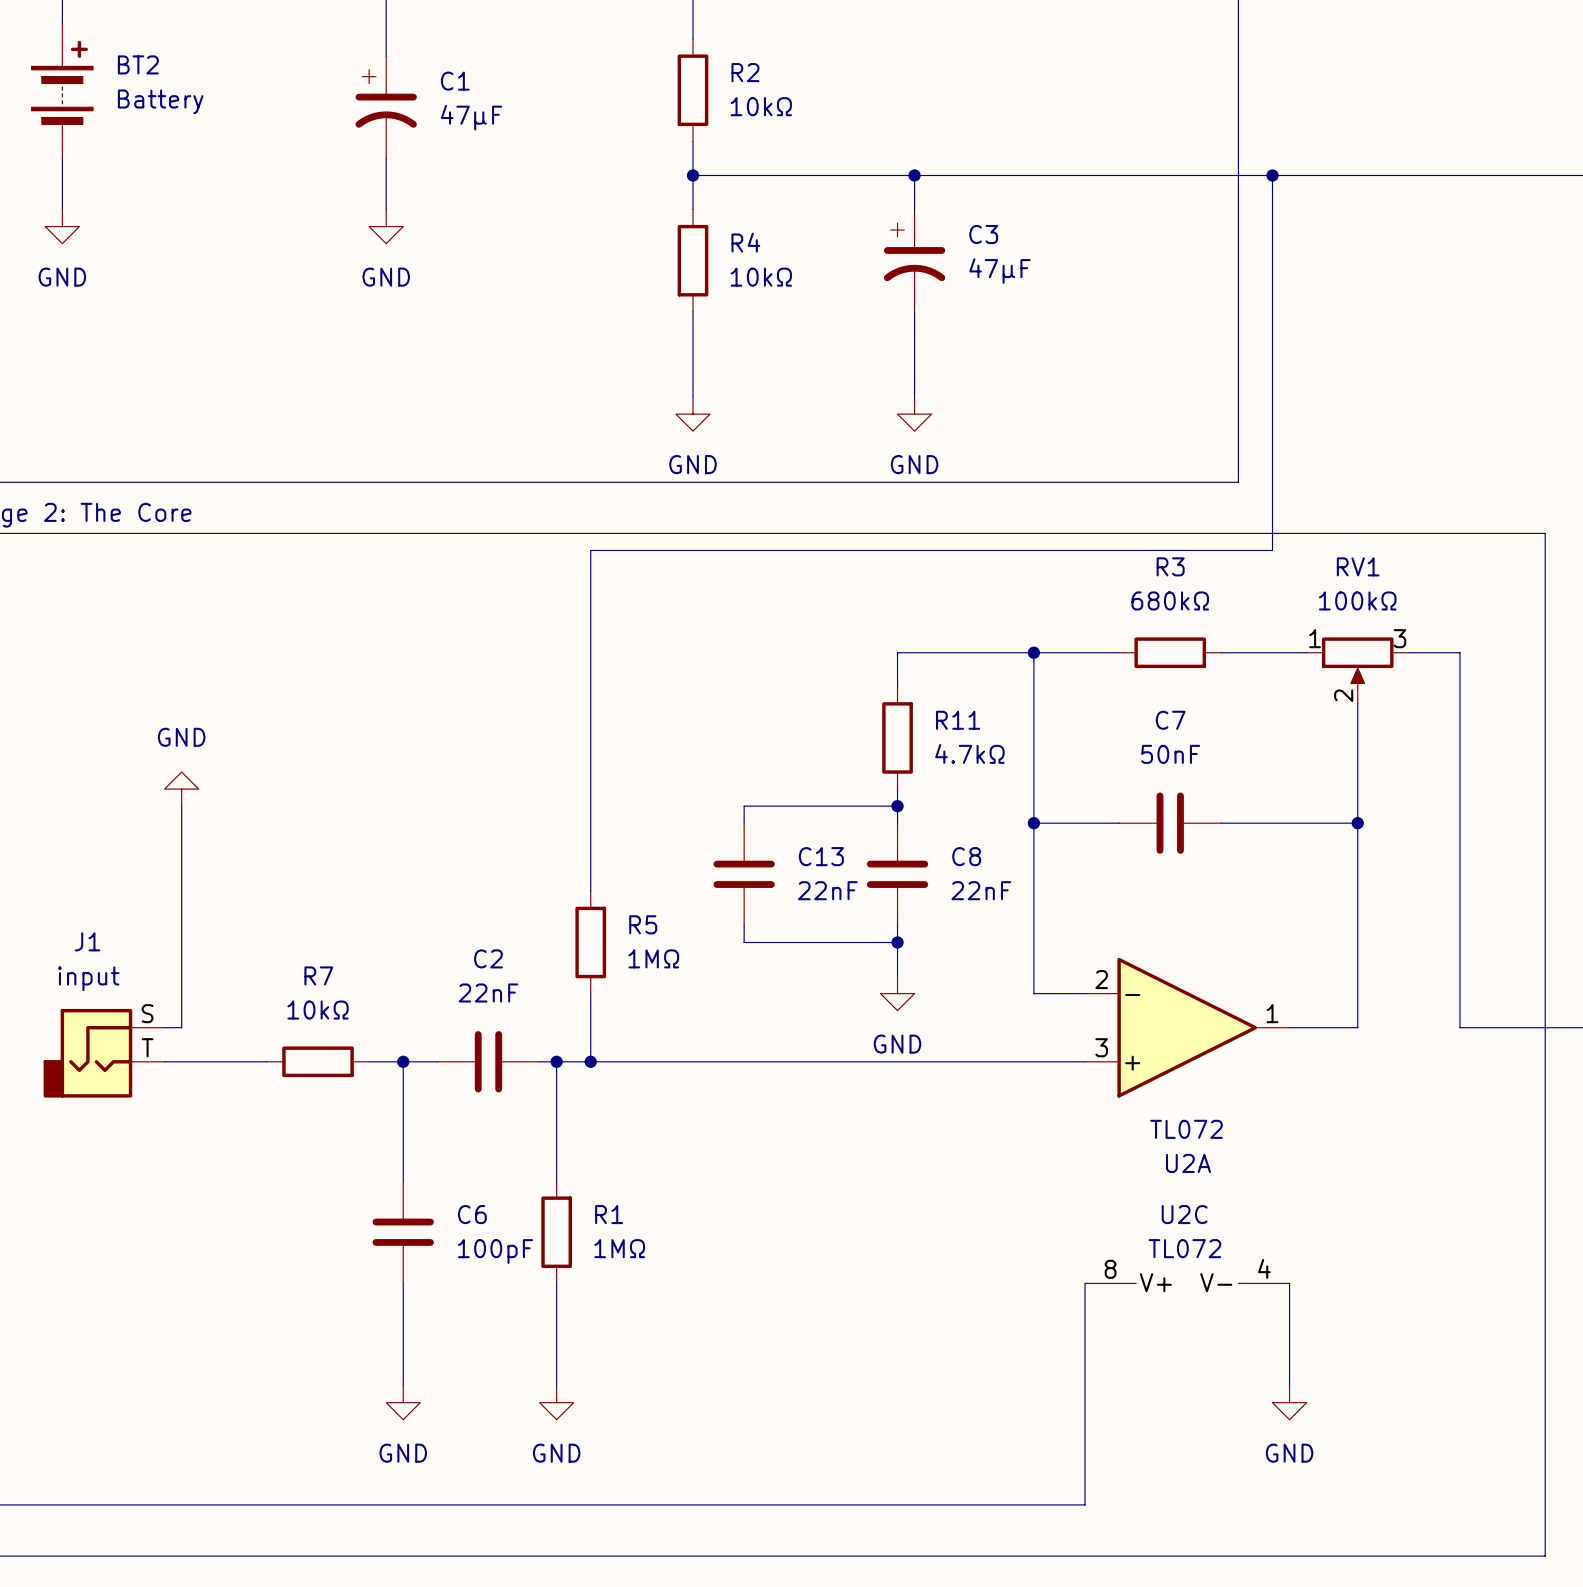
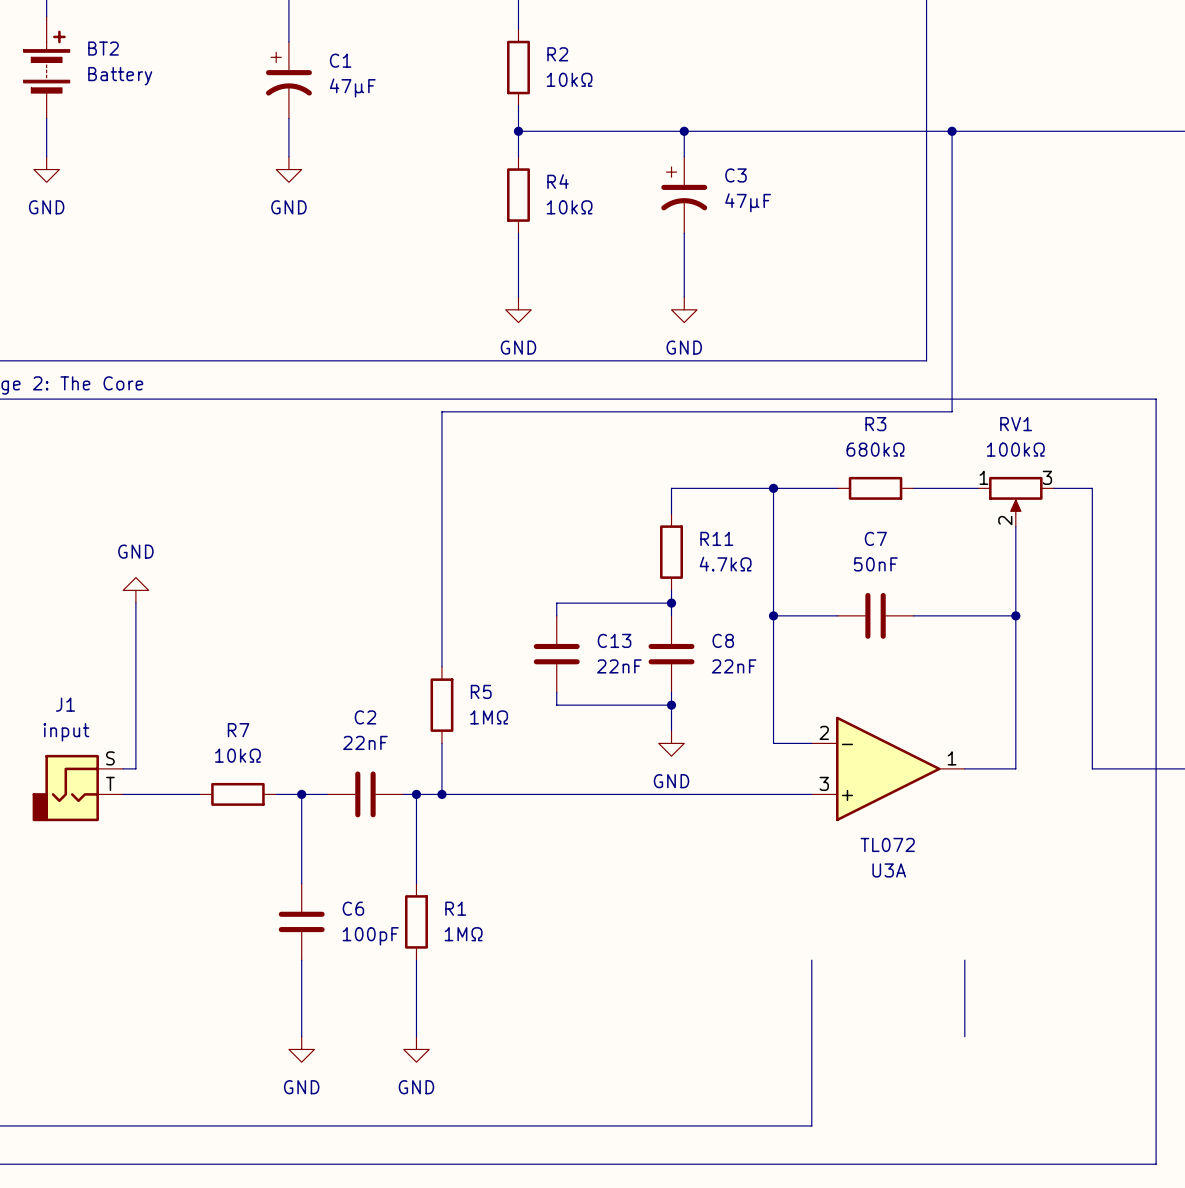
U2A name: U2A (1188, 1163) -> U3A (889, 870)
U2C: TL072 (1187, 1283) -> none
power symbol: GND (1289, 1402) -> none

